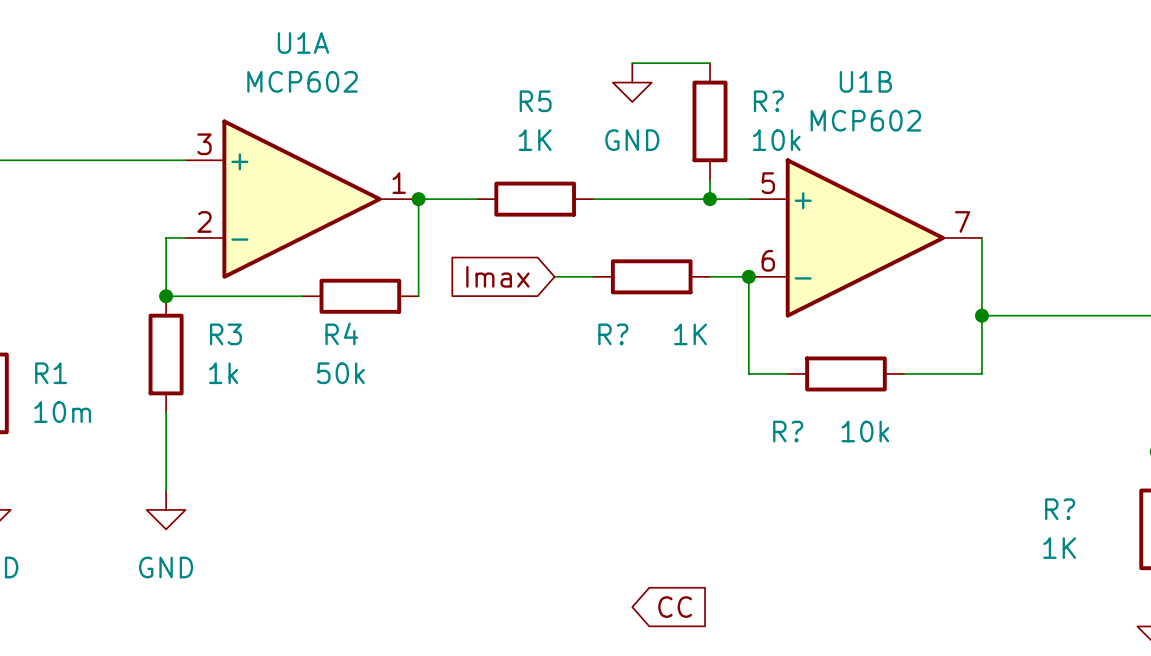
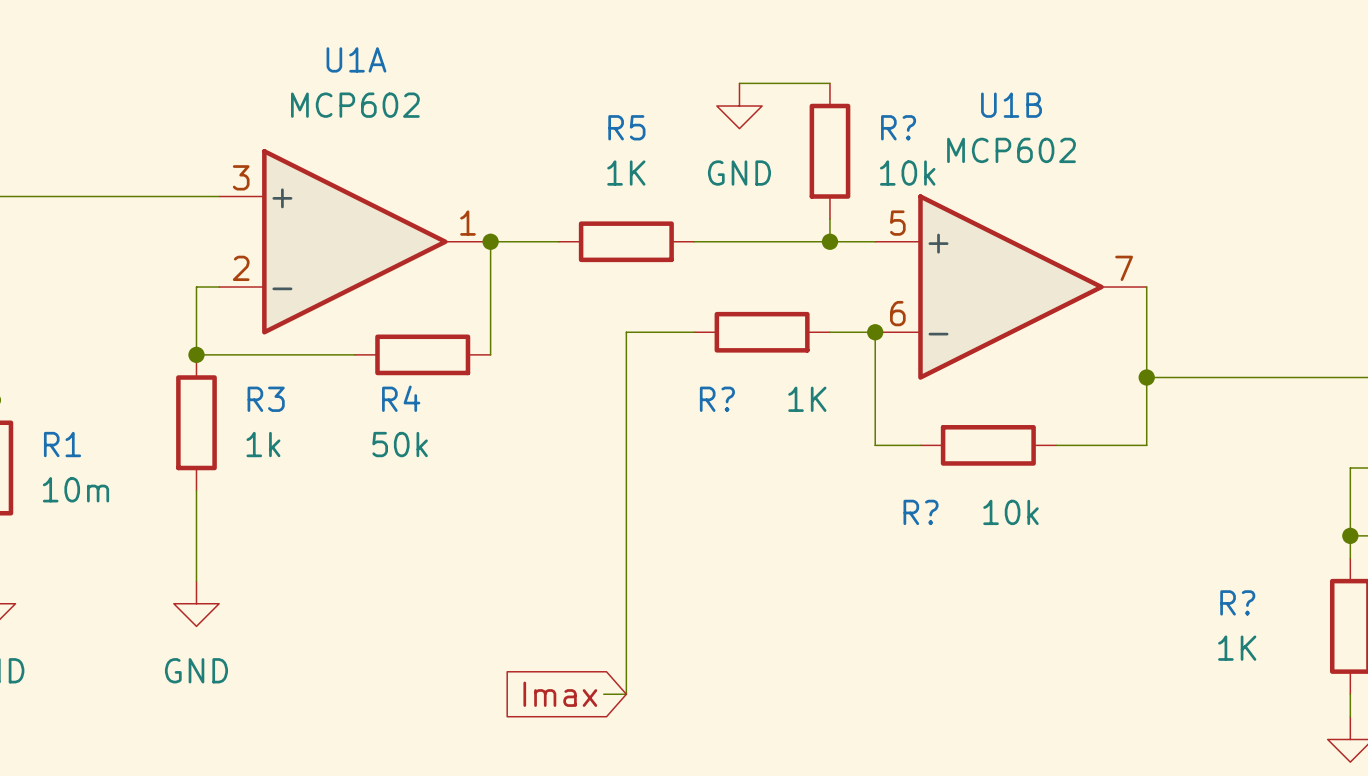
global label position: Imax (497, 276) -> Imax (560, 694)
wire: none -> (648, 332) (626, 332) (626, 694) (603, 694)
global label: CC (675, 607) -> none

